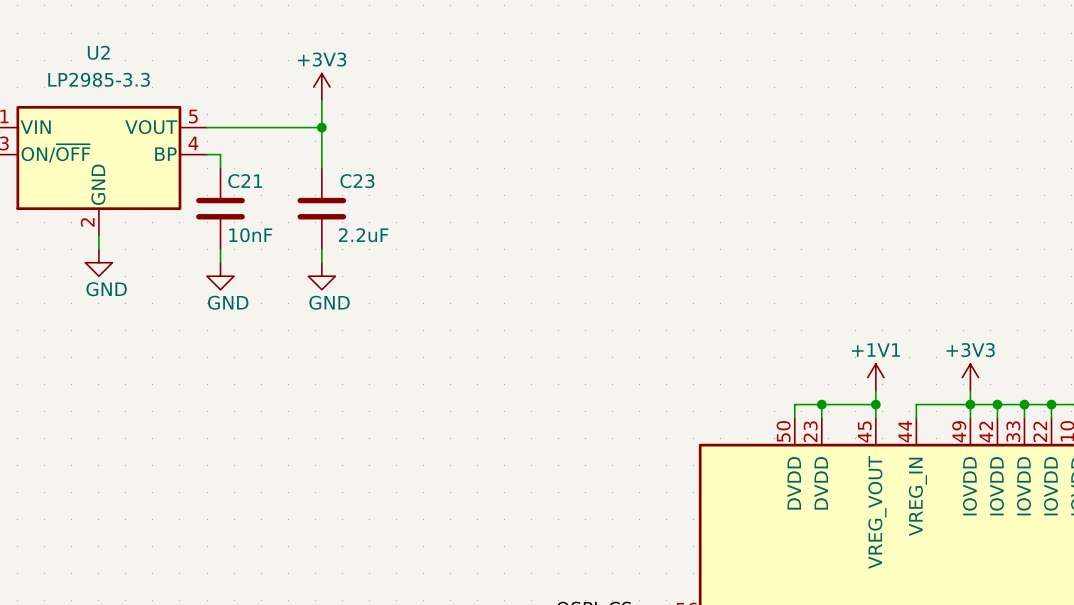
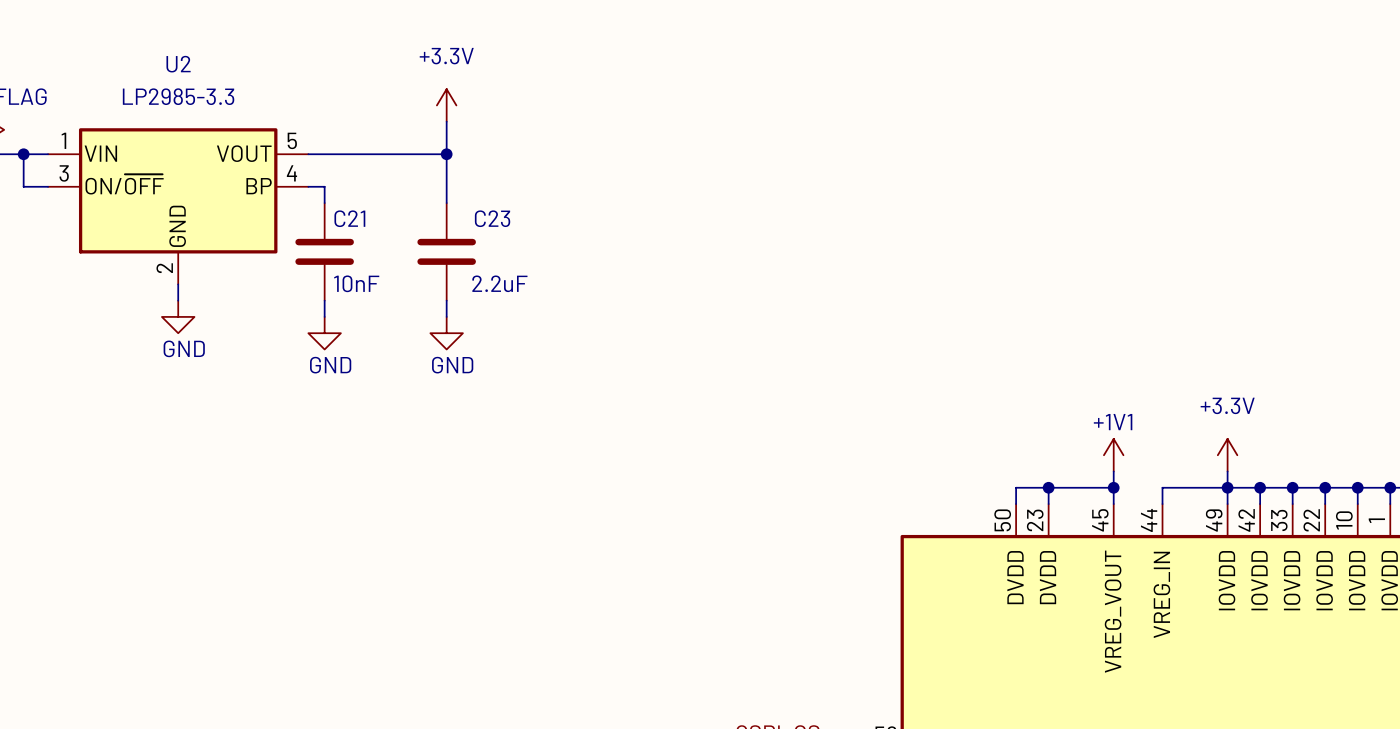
power symbol: +3V3 (321, 87) -> +3.3V (446, 105)
power symbol: +3V3 (970, 377) -> +3.3V (1227, 455)

